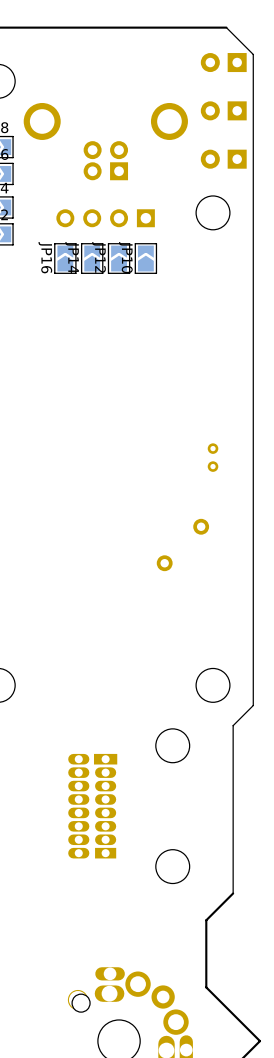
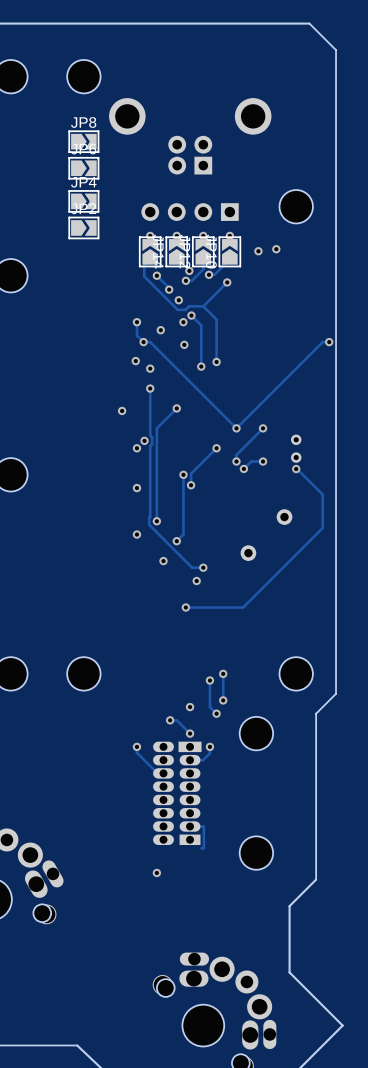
part: (223, 62) -> none
part: (223, 110) -> none
part: (223, 159) -> none
via: none -> (150, 235)
via: none -> (176, 235)
via: none -> (203, 235)
via: none -> (229, 235)
via: none -> (276, 249)
JP16 name: JP16 (45, 257) -> none
via: none -> (258, 251)
track: none -> (150, 259) (144, 265) (144, 276) (177, 309) (185, 309) (189, 306) (203, 306)
track: none -> (203, 259) (203, 269) (191, 280) (185, 280)
track: none -> (229, 259) (214, 274) (209, 274)
via: none -> (189, 270)
via: none -> (209, 274)
track: none -> (156, 275) (169, 289)
via: none -> (156, 275)
via: none -> (185, 280)
track: none -> (227, 282) (203, 306)
via: none -> (227, 282)
via: none -> (169, 289)
via: none -> (178, 300)
track: none -> (203, 306) (216, 319) (216, 362)
track: none -> (191, 315) (201, 325) (201, 366)
via: none -> (191, 315)
track: none -> (136, 322) (136, 335) (143, 342) (150, 342) (236, 428) (322, 342) (329, 342)
via: none -> (136, 322)
via: none -> (183, 322)
via: none -> (160, 330)
via: none -> (143, 342)
via: none -> (329, 342)
via: none -> (184, 344)
via: none -> (135, 361)
via: none -> (216, 362)
via: none -> (201, 366)
via: none -> (150, 368)
track: none -> (150, 388) (150, 435) (152, 444) (150, 446) (149, 524) (192, 567) (203, 567)
via: none -> (150, 388)
track: none -> (176, 408) (156, 428) (156, 521)
via: none -> (176, 408)
via: none -> (122, 410)
via: none -> (236, 428)
track: none -> (263, 428) (236, 454) (236, 461)
via: none -> (263, 428)
via: none -> (144, 440)
via: none -> (136, 448)
track: none -> (216, 448) (191, 473) (191, 485)
via: none -> (216, 448)
via: none -> (236, 461)
track: none -> (263, 461) (251, 461) (243, 468)
via: none -> (263, 461)
via: none -> (243, 468)
track: none -> (296, 469) (322, 494) (322, 527) (243, 607) (185, 607)
via: none -> (296, 469)
track: none -> (183, 474) (183, 534) (176, 541)
via: none -> (183, 474)
via: none -> (191, 485)
via: none -> (136, 488)
via: none -> (156, 521)
via: none -> (136, 534)
via: none -> (176, 541)
via: none -> (163, 561)
via: none -> (203, 567)
via: none -> (196, 580)
via: none -> (185, 607)
track: none -> (223, 673) (223, 700)
via: none -> (223, 673)
track: none -> (209, 680) (209, 707) (216, 713)
via: none -> (209, 680)
via: none -> (223, 700)
via: none -> (190, 707)
via: none -> (216, 713)
track: none -> (170, 720) (176, 720) (190, 733)
via: none -> (170, 720)
via: none -> (190, 733)
track: none -> (136, 746) (136, 752) (157, 773) (163, 773)
via: none -> (136, 746)
track: none -> (209, 746) (209, 753) (203, 760) (190, 760)
via: none -> (209, 746)
track: none -> (190, 826) (203, 827) (203, 847) (201, 848)
via: none -> (156, 872)

